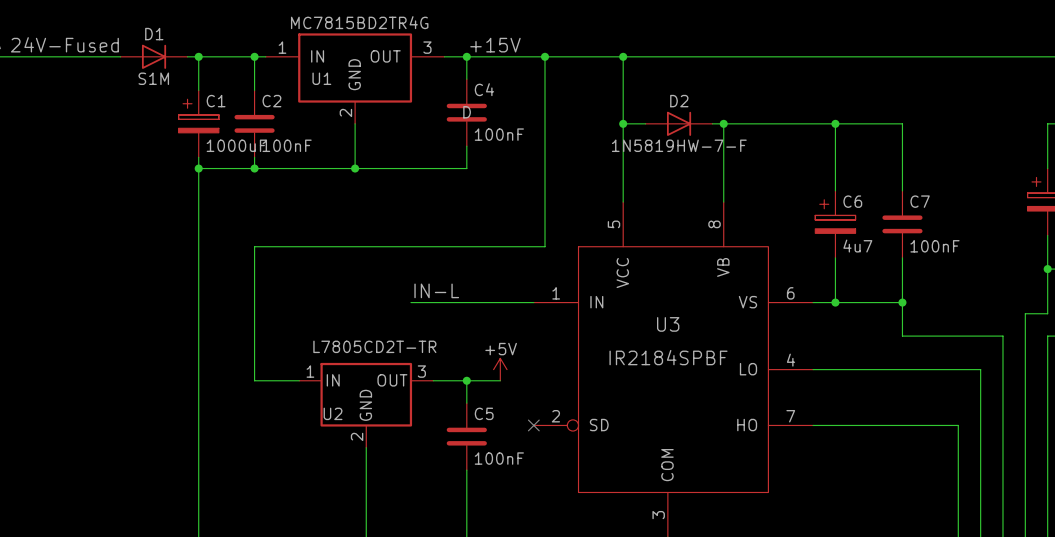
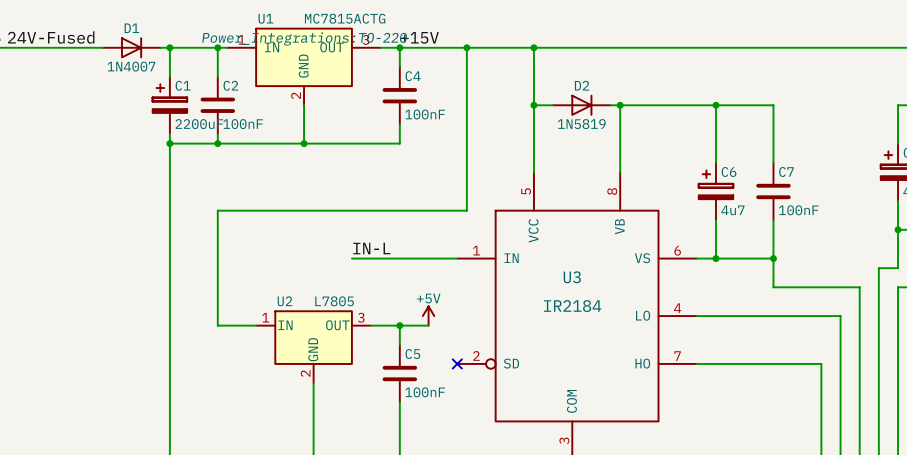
U1 value: MC7815BD2TR4G (359, 22) -> MC7815ACTG (345, 18)
U1 text: none -> Power_Integrations:TO-220 (304, 38)
D1 value: S1M (153, 78) -> 1N4007 (131, 66)
U1 name position: U1 (321, 78) -> U1 (265, 18)
C4 text: D (467, 112) -> none
C1 value: 1000uF (236, 145) -> 2200uF (199, 124)
D2 value: 1N5819HW-7-F (679, 145) -> 1N5819 (581, 124)
U2 value: L7805CD2T-TR (374, 346) -> L7805 (334, 301)
U3 value: IR2184SPBF (668, 357) -> IR2184 (572, 306)
U2 name position: U2 (333, 413) -> U2 (284, 301)

